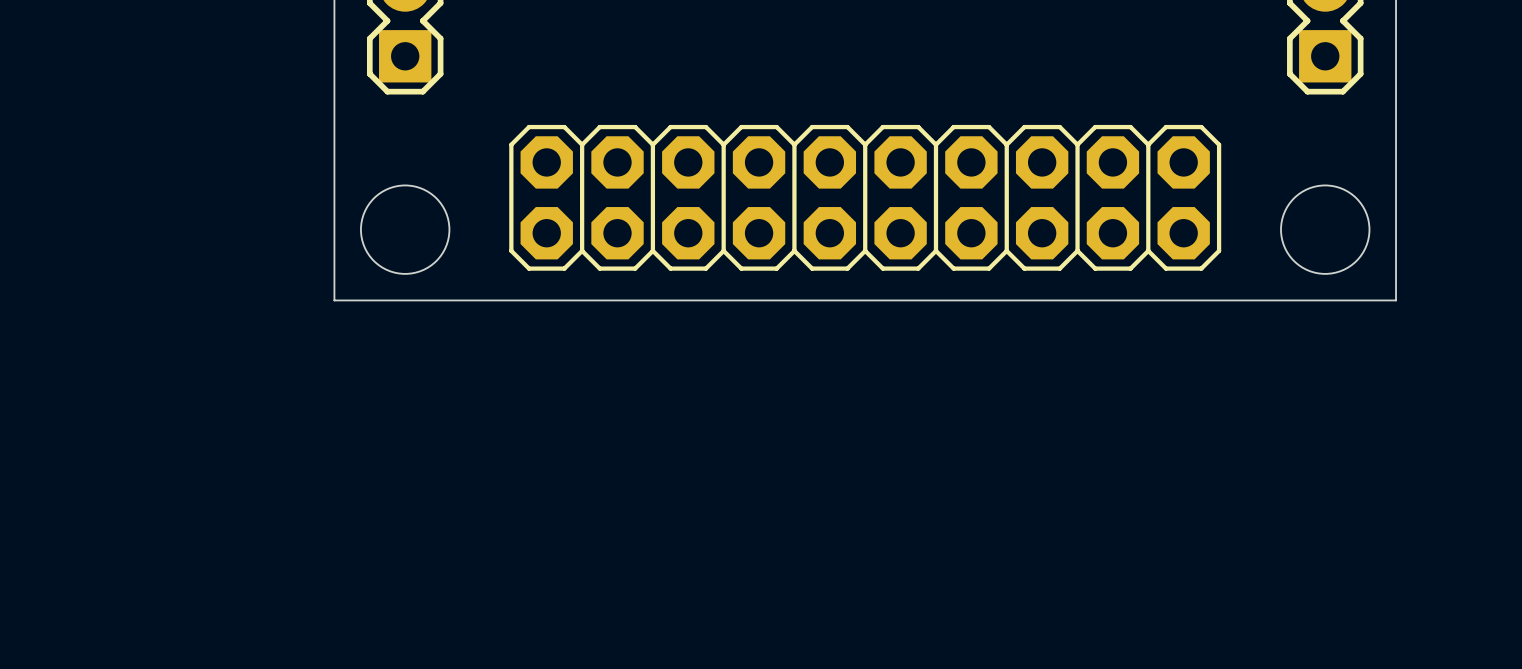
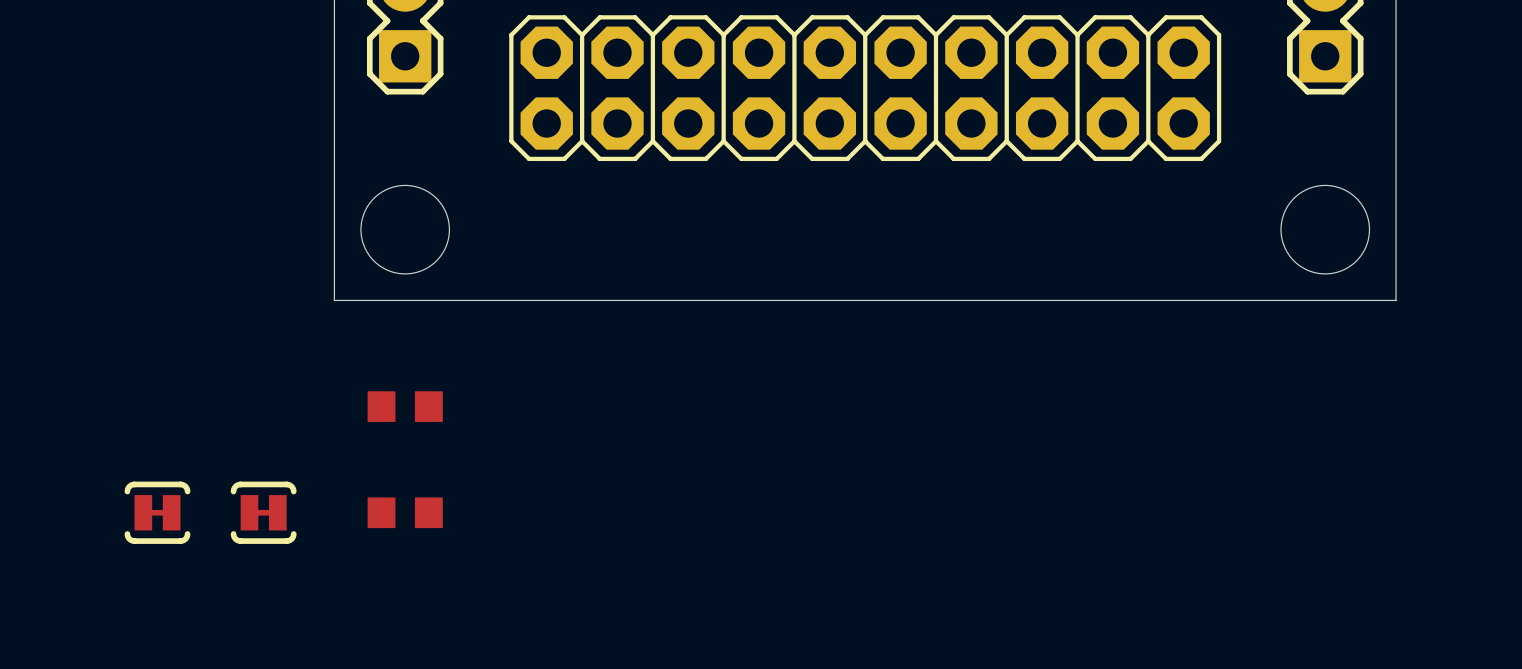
part position: (865, 197) -> (865, 88)
part: none -> (405, 406)
part: none -> (157, 512)
part: none -> (263, 512)
part: none -> (405, 512)

